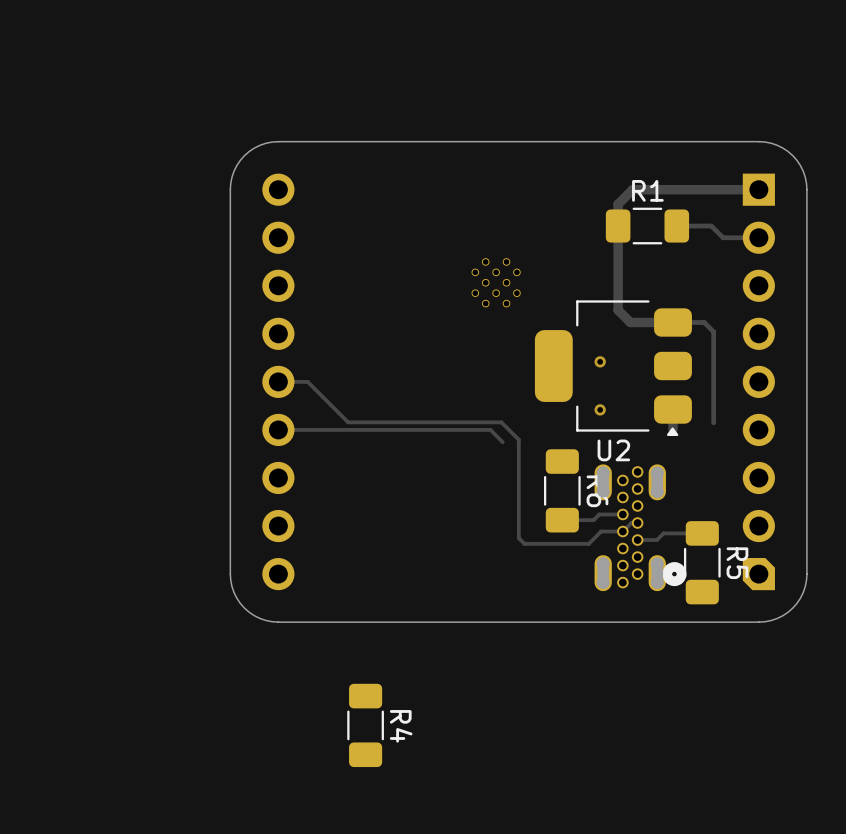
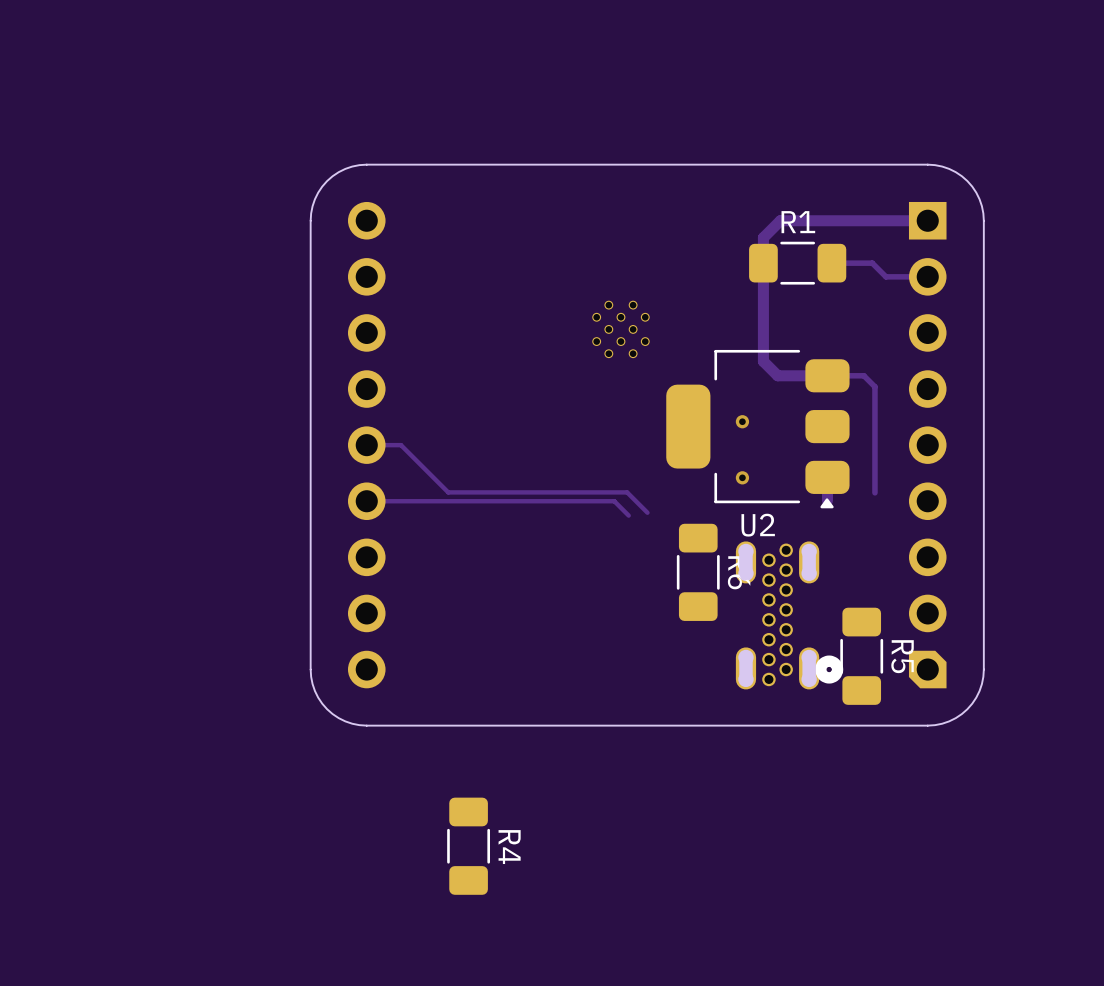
track: (518, 439) (518, 538) (524, 543) (588, 543) (601, 531) (622, 531) (631, 523) (637, 523) -> none
track: (622, 514) (599, 514) (593, 520) (562, 520) -> none
track: (702, 533) (663, 533) (656, 540) (637, 540) -> none

